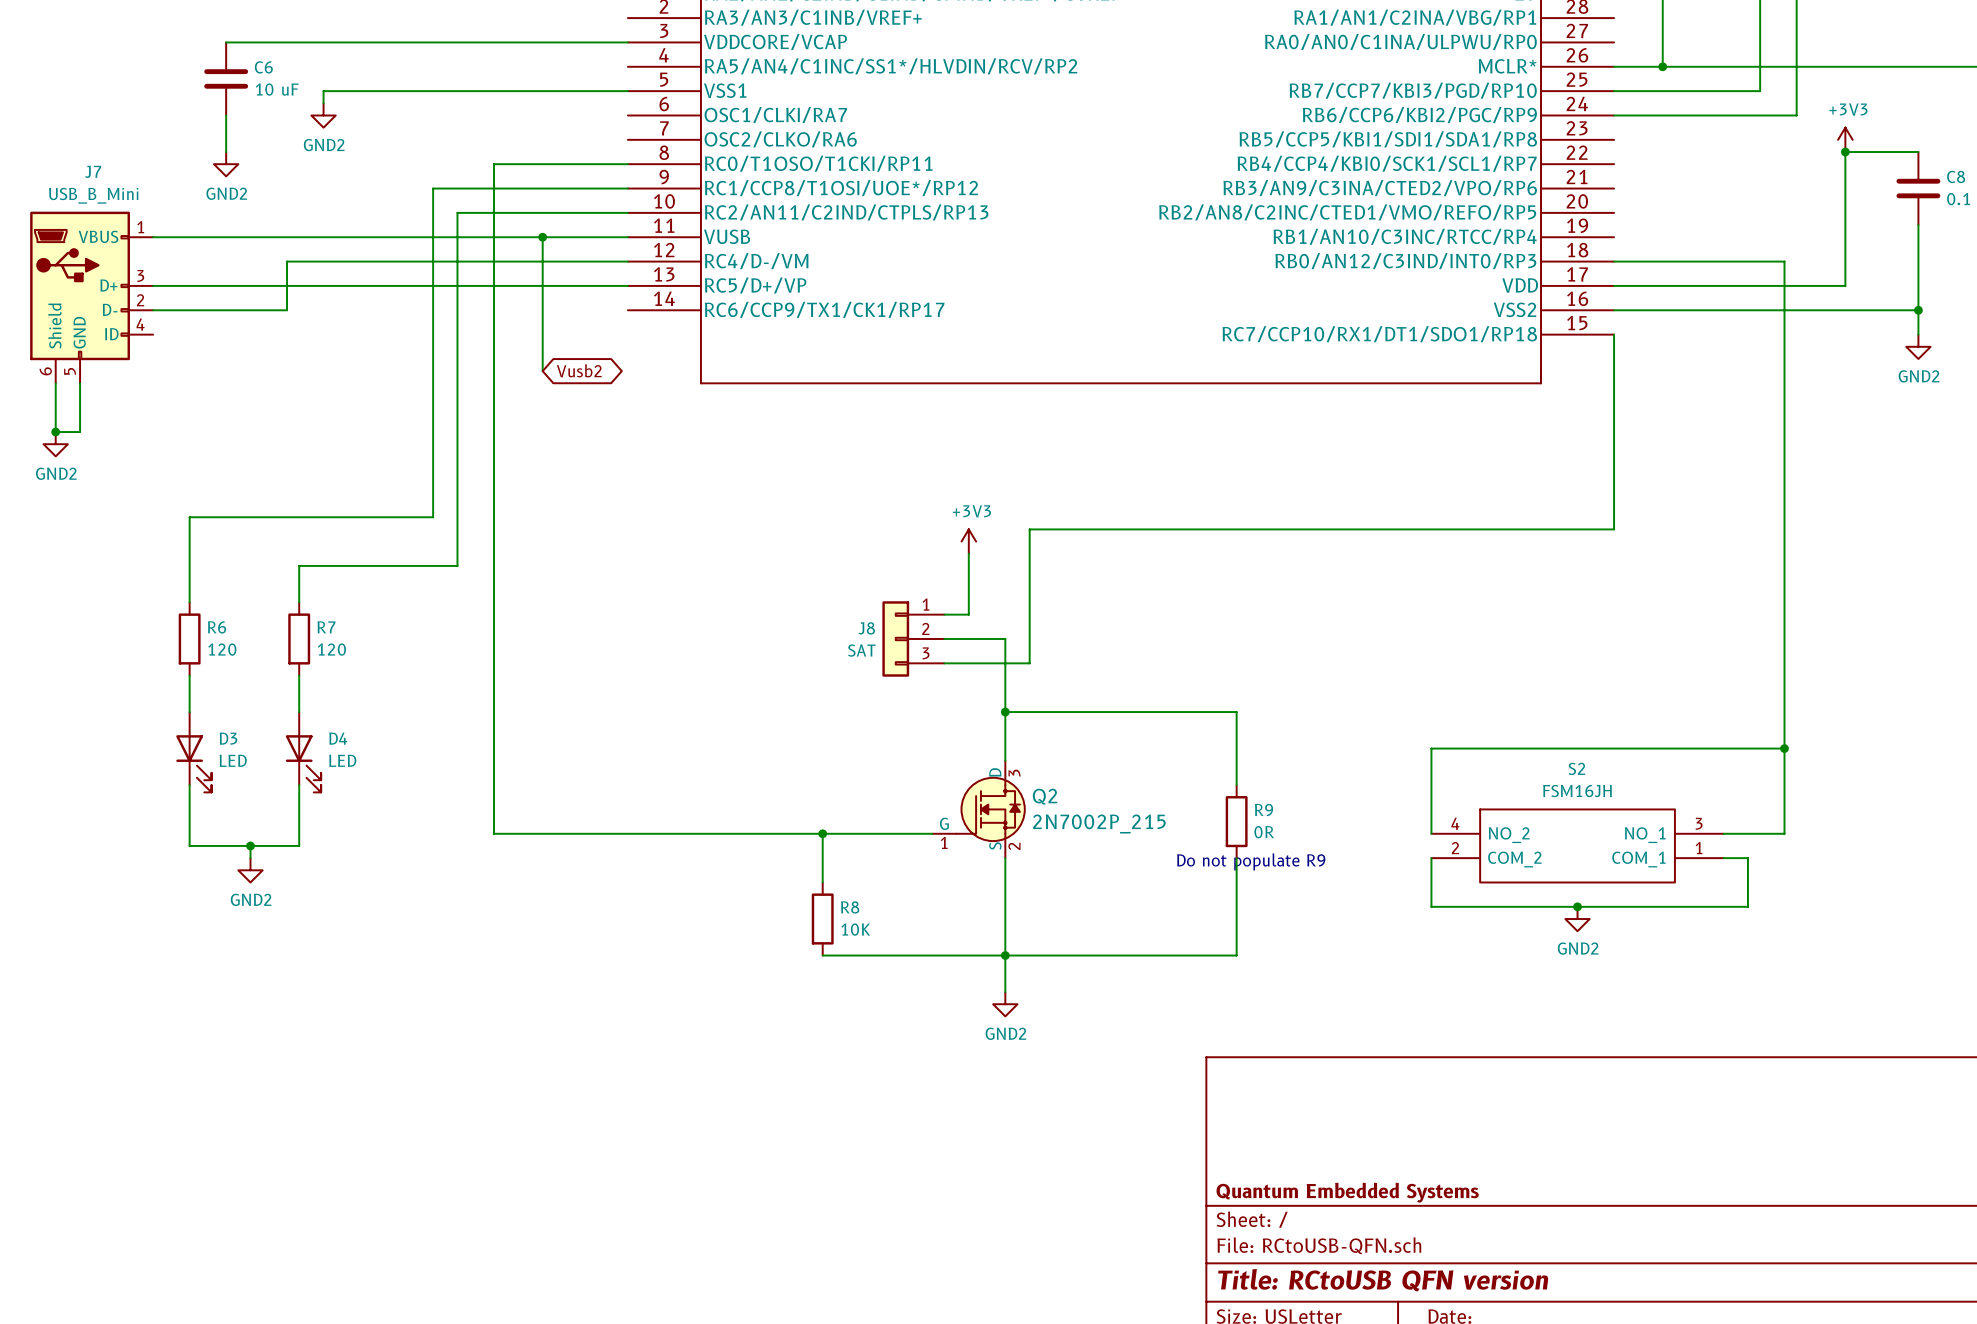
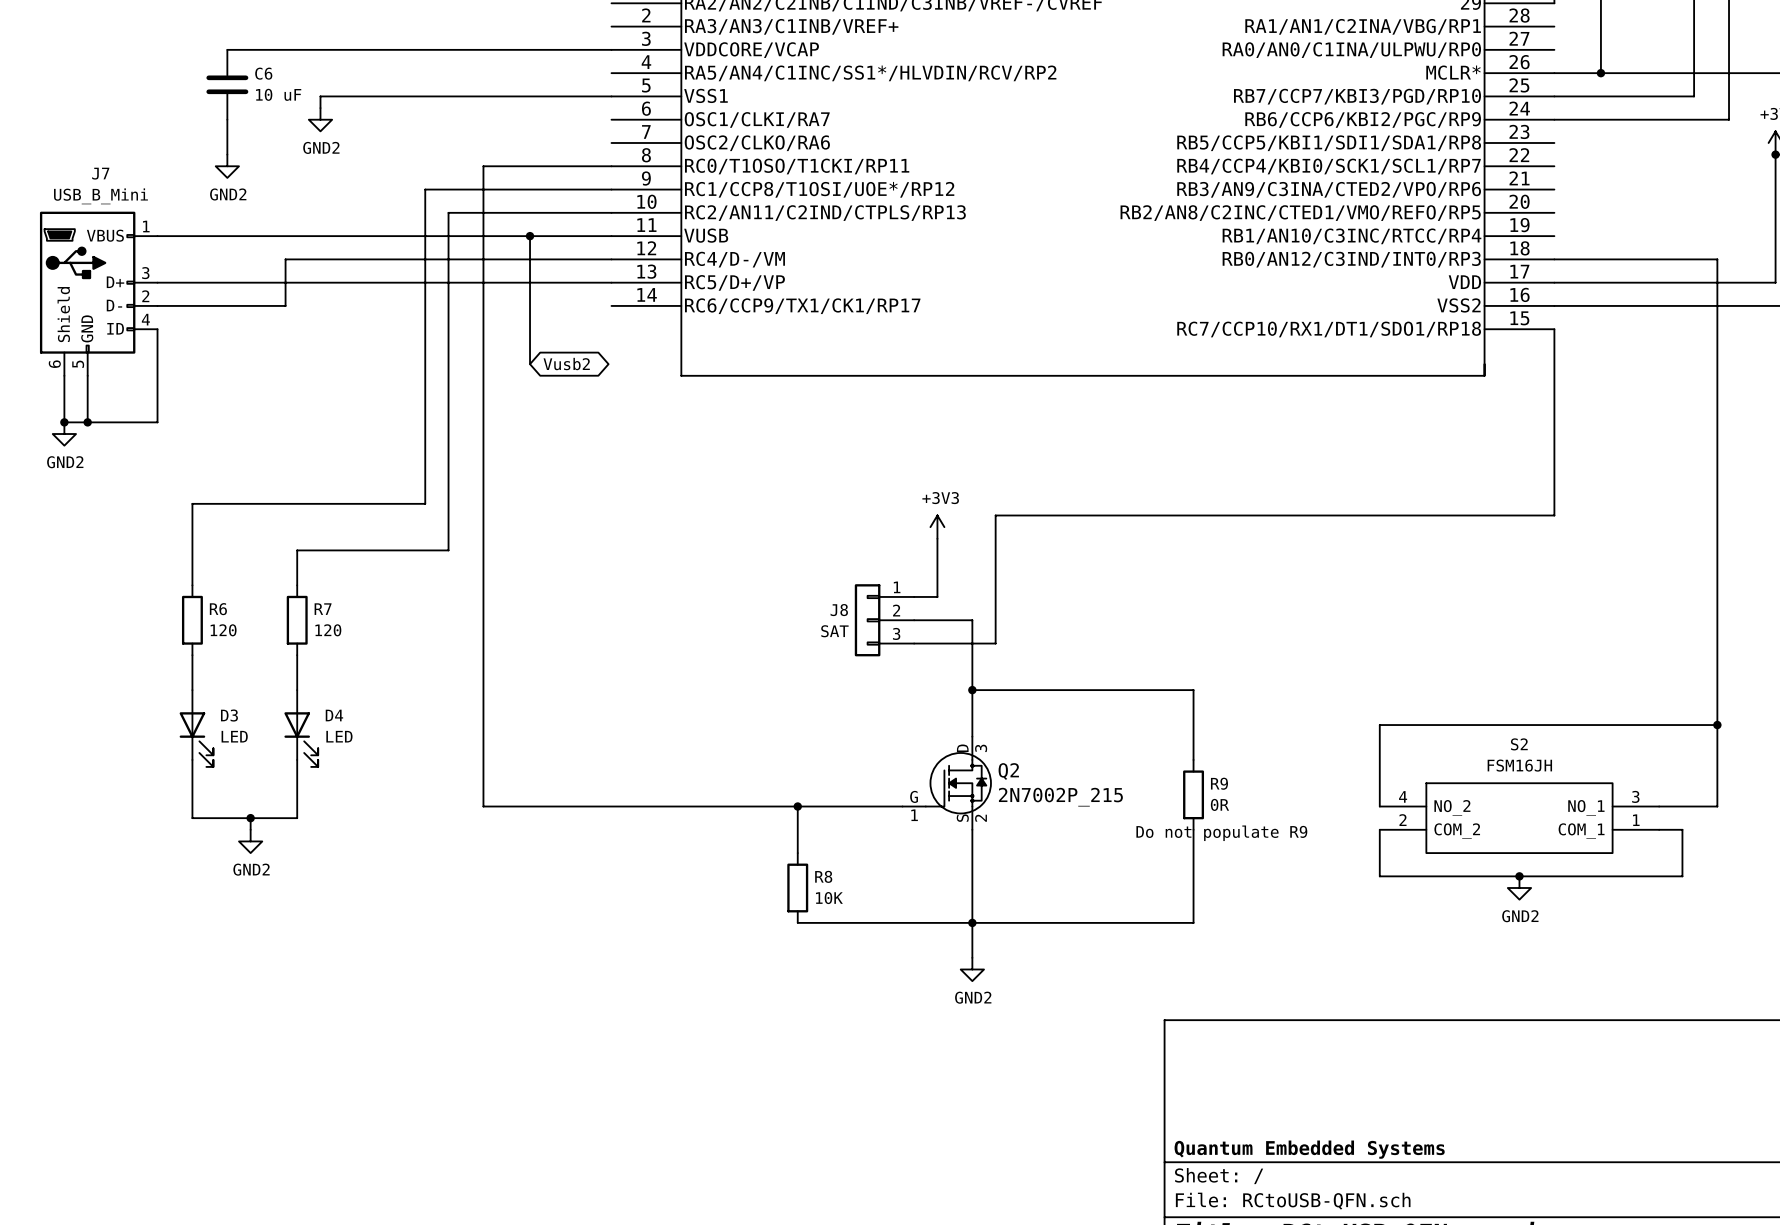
wire: none -> (157, 329) (157, 422) (87, 422)
junction: none -> (87, 422)

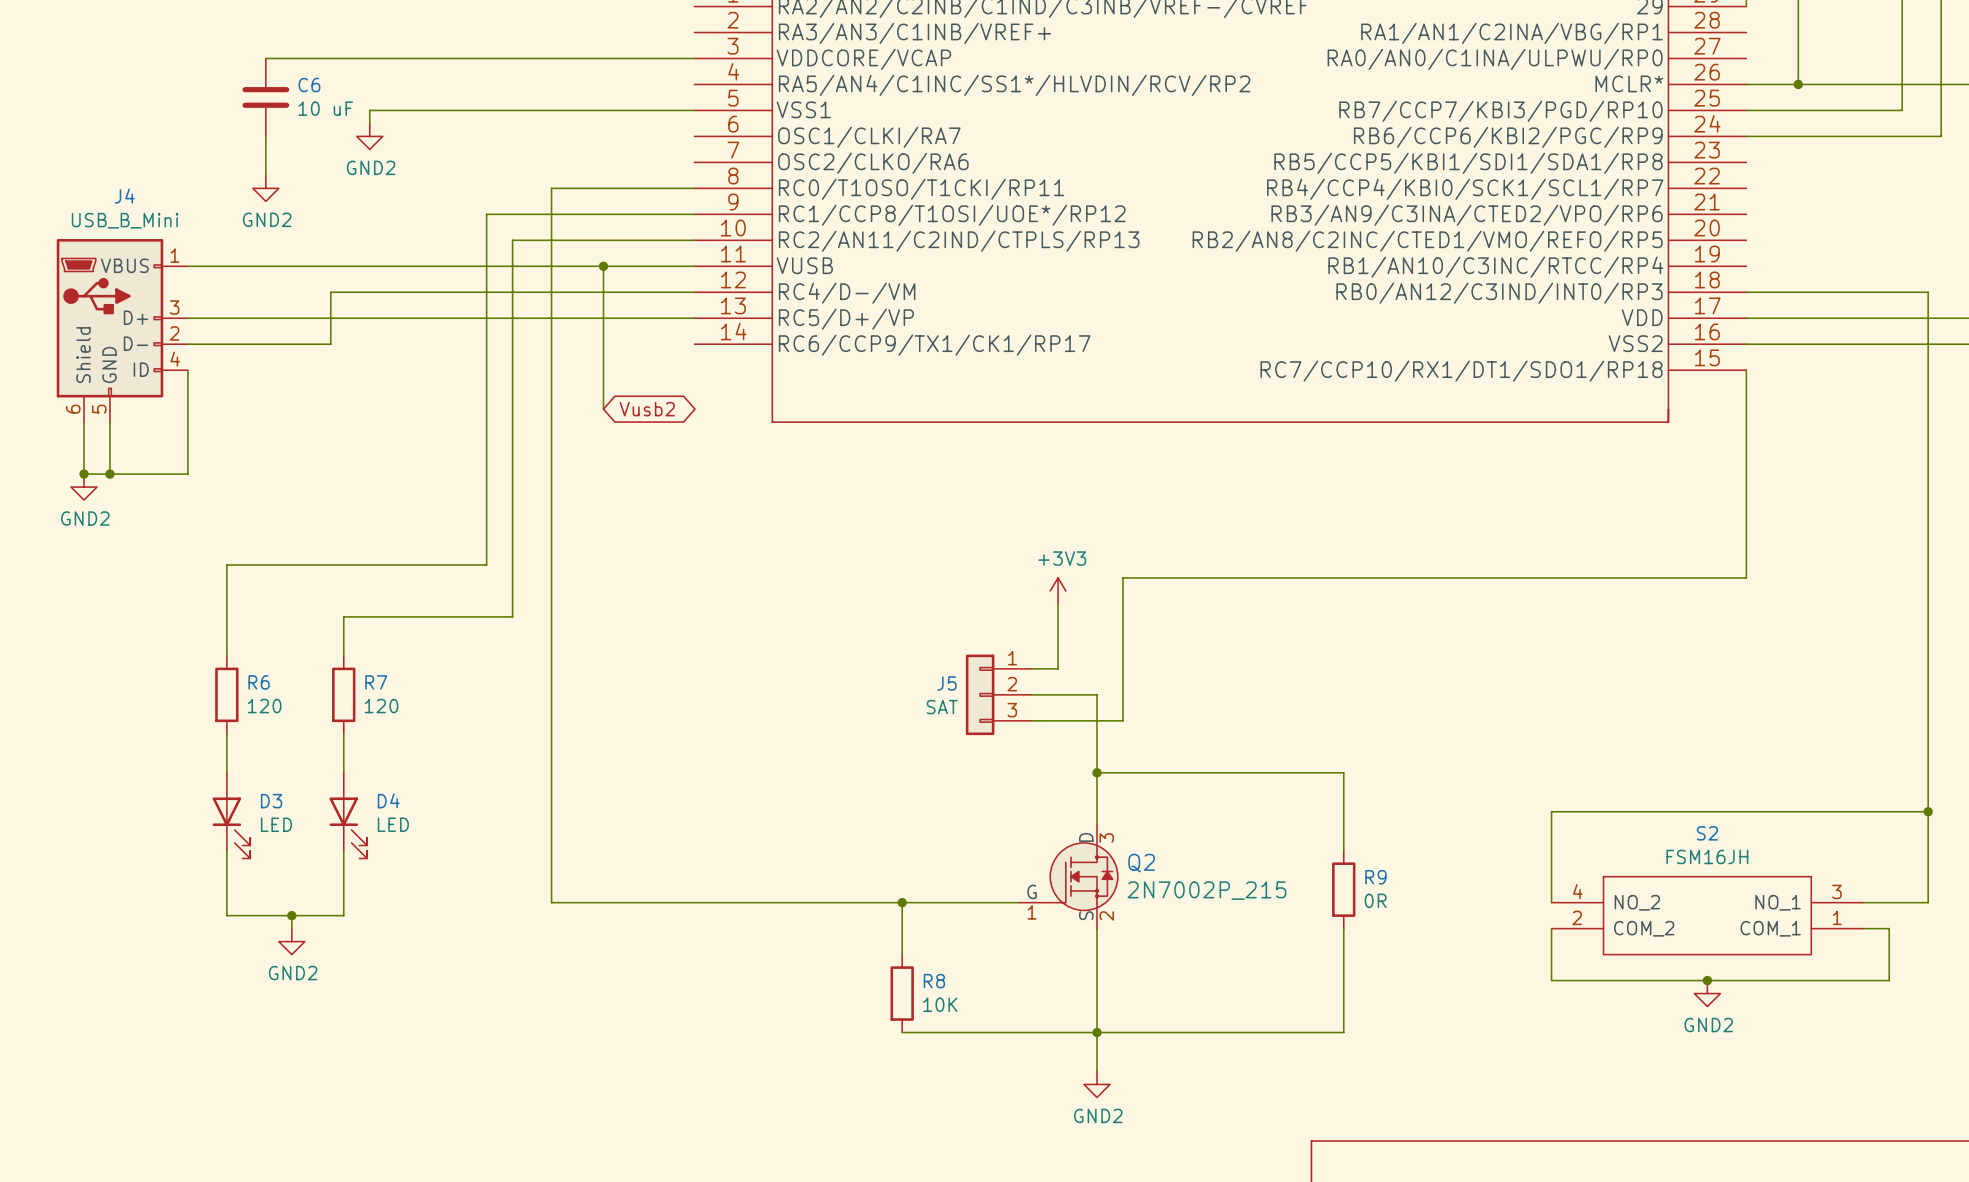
J7 name: J7 (100, 173) -> J4 (124, 196)
J8 name: J8 (839, 610) -> J5 (946, 683)
text: Do not populate R9 (1221, 833) -> none

